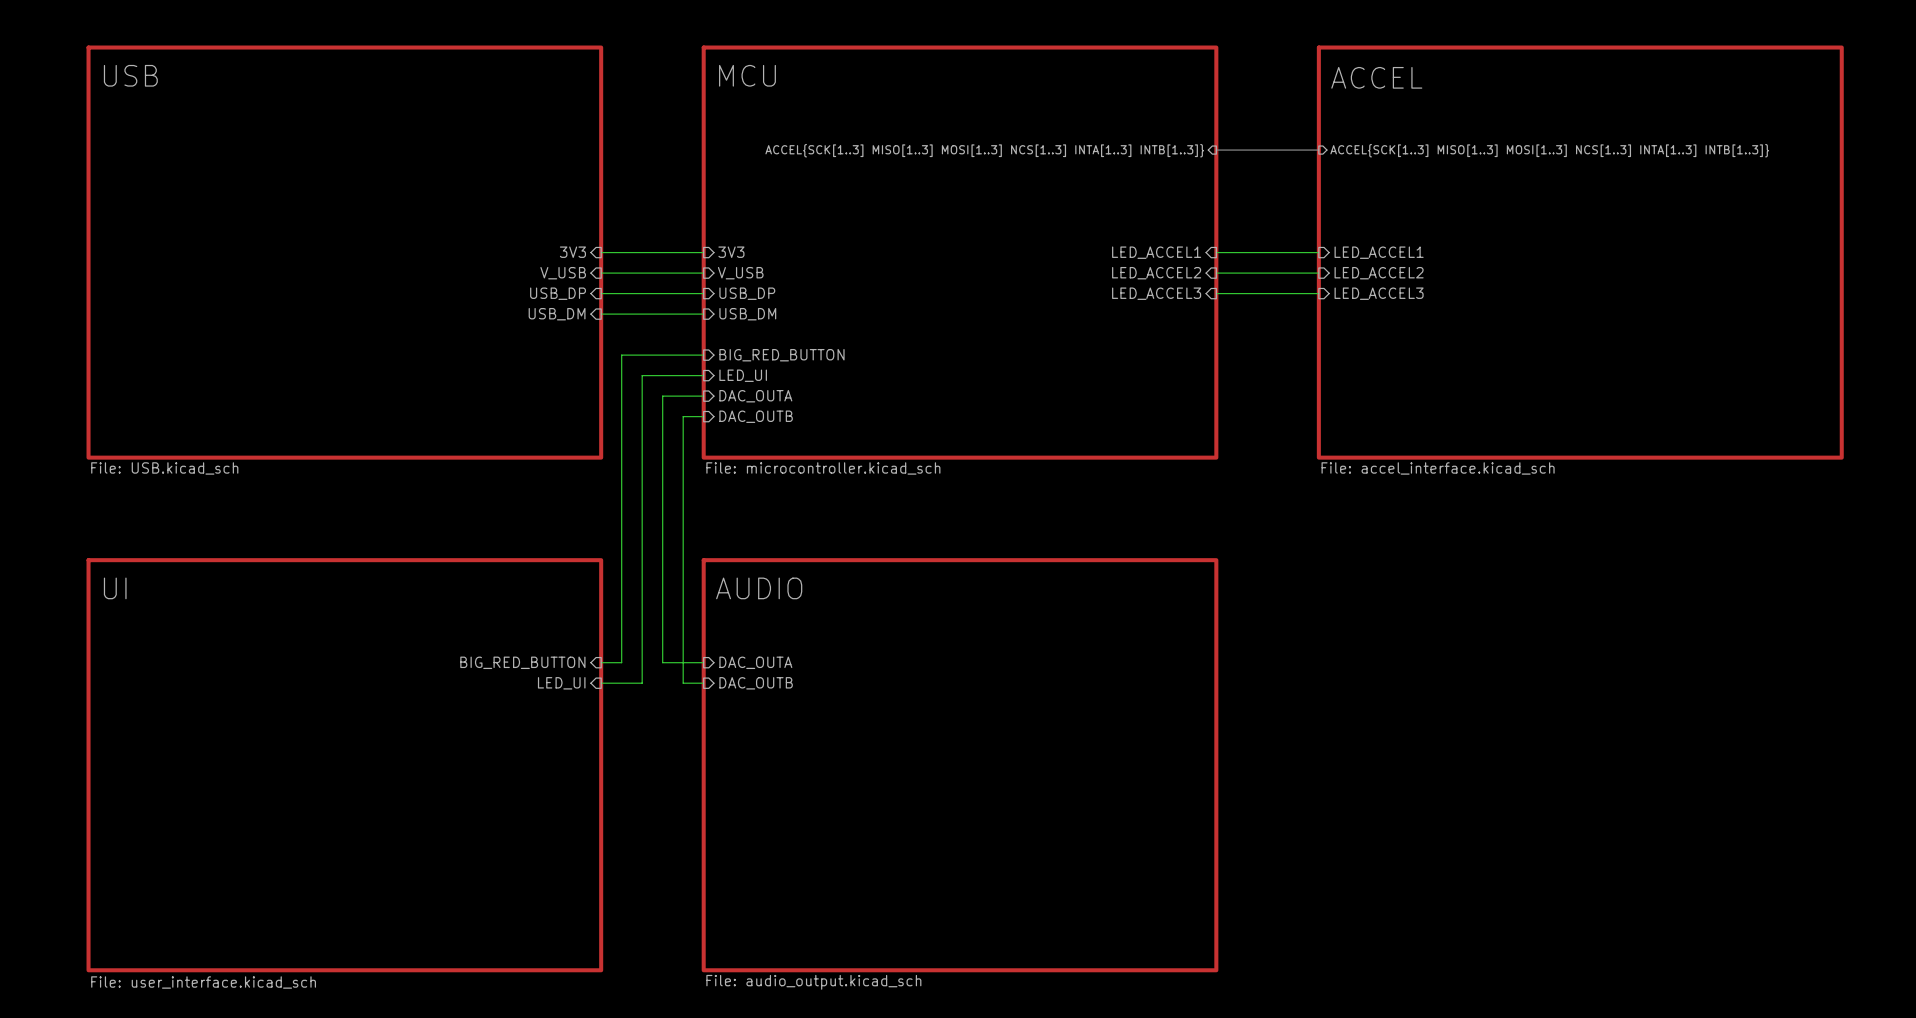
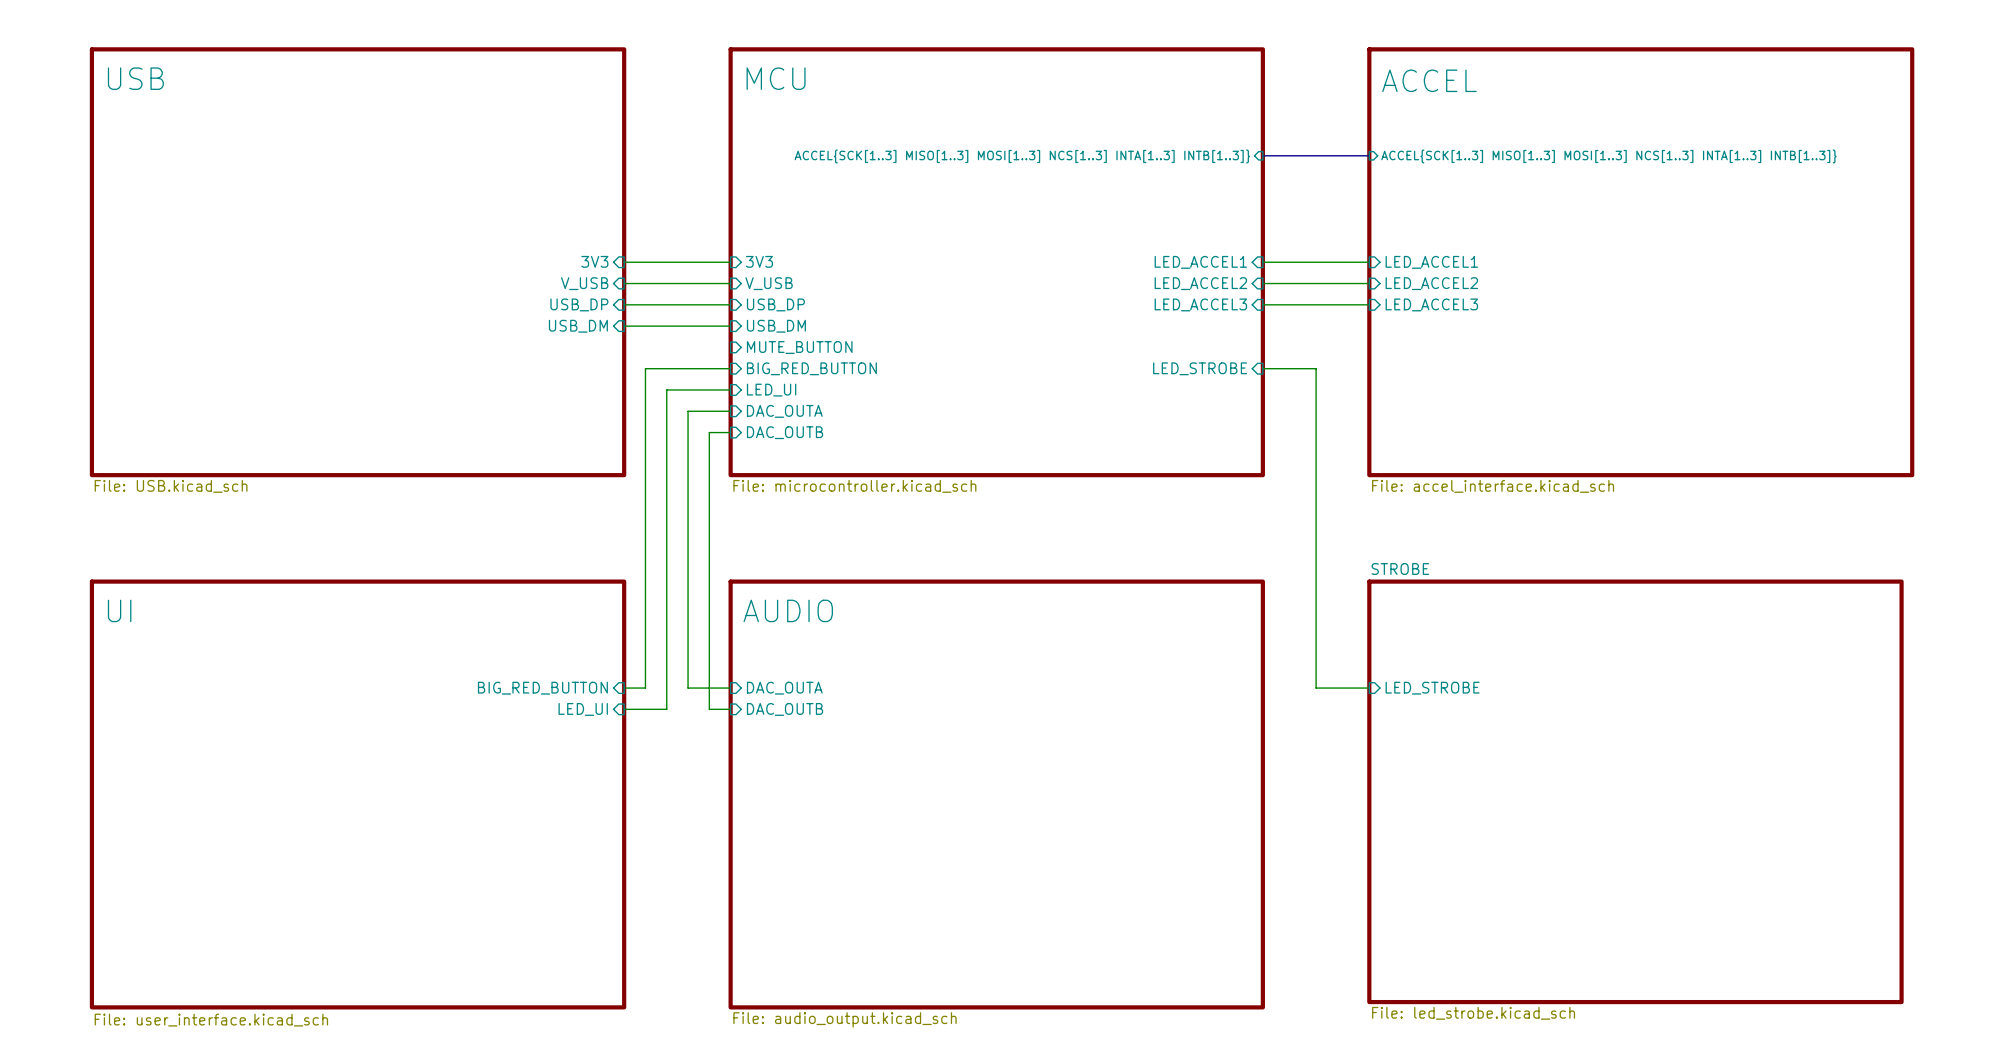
sheet pin: none -> MUTE_BUTTON (799, 347)
sheet pin: none -> LED_STROBE (1200, 368)
wire: none -> (1262, 368) (1316, 368) (1316, 688) (1369, 688)
sheet pin: none -> LED_STROBE (1432, 688)
sheet STROBE: none -> File: led_strobe.kicad_sch (1635, 791)

